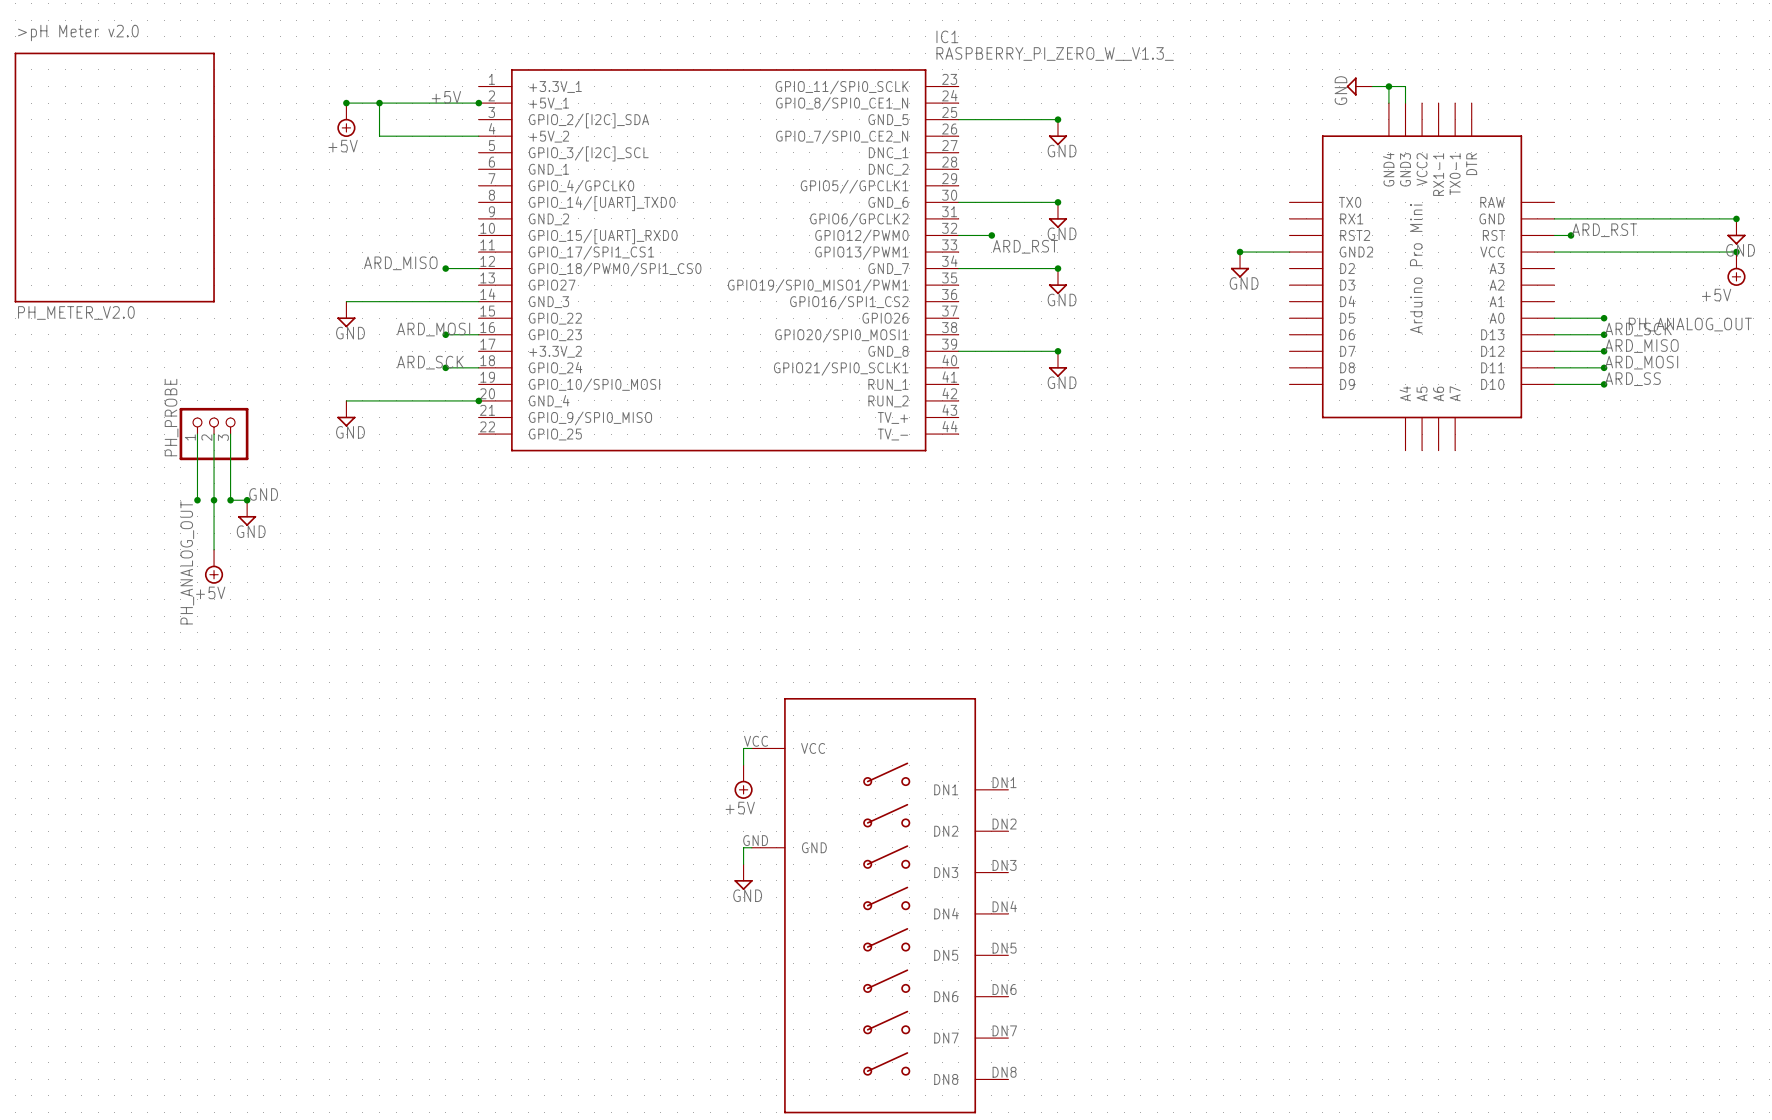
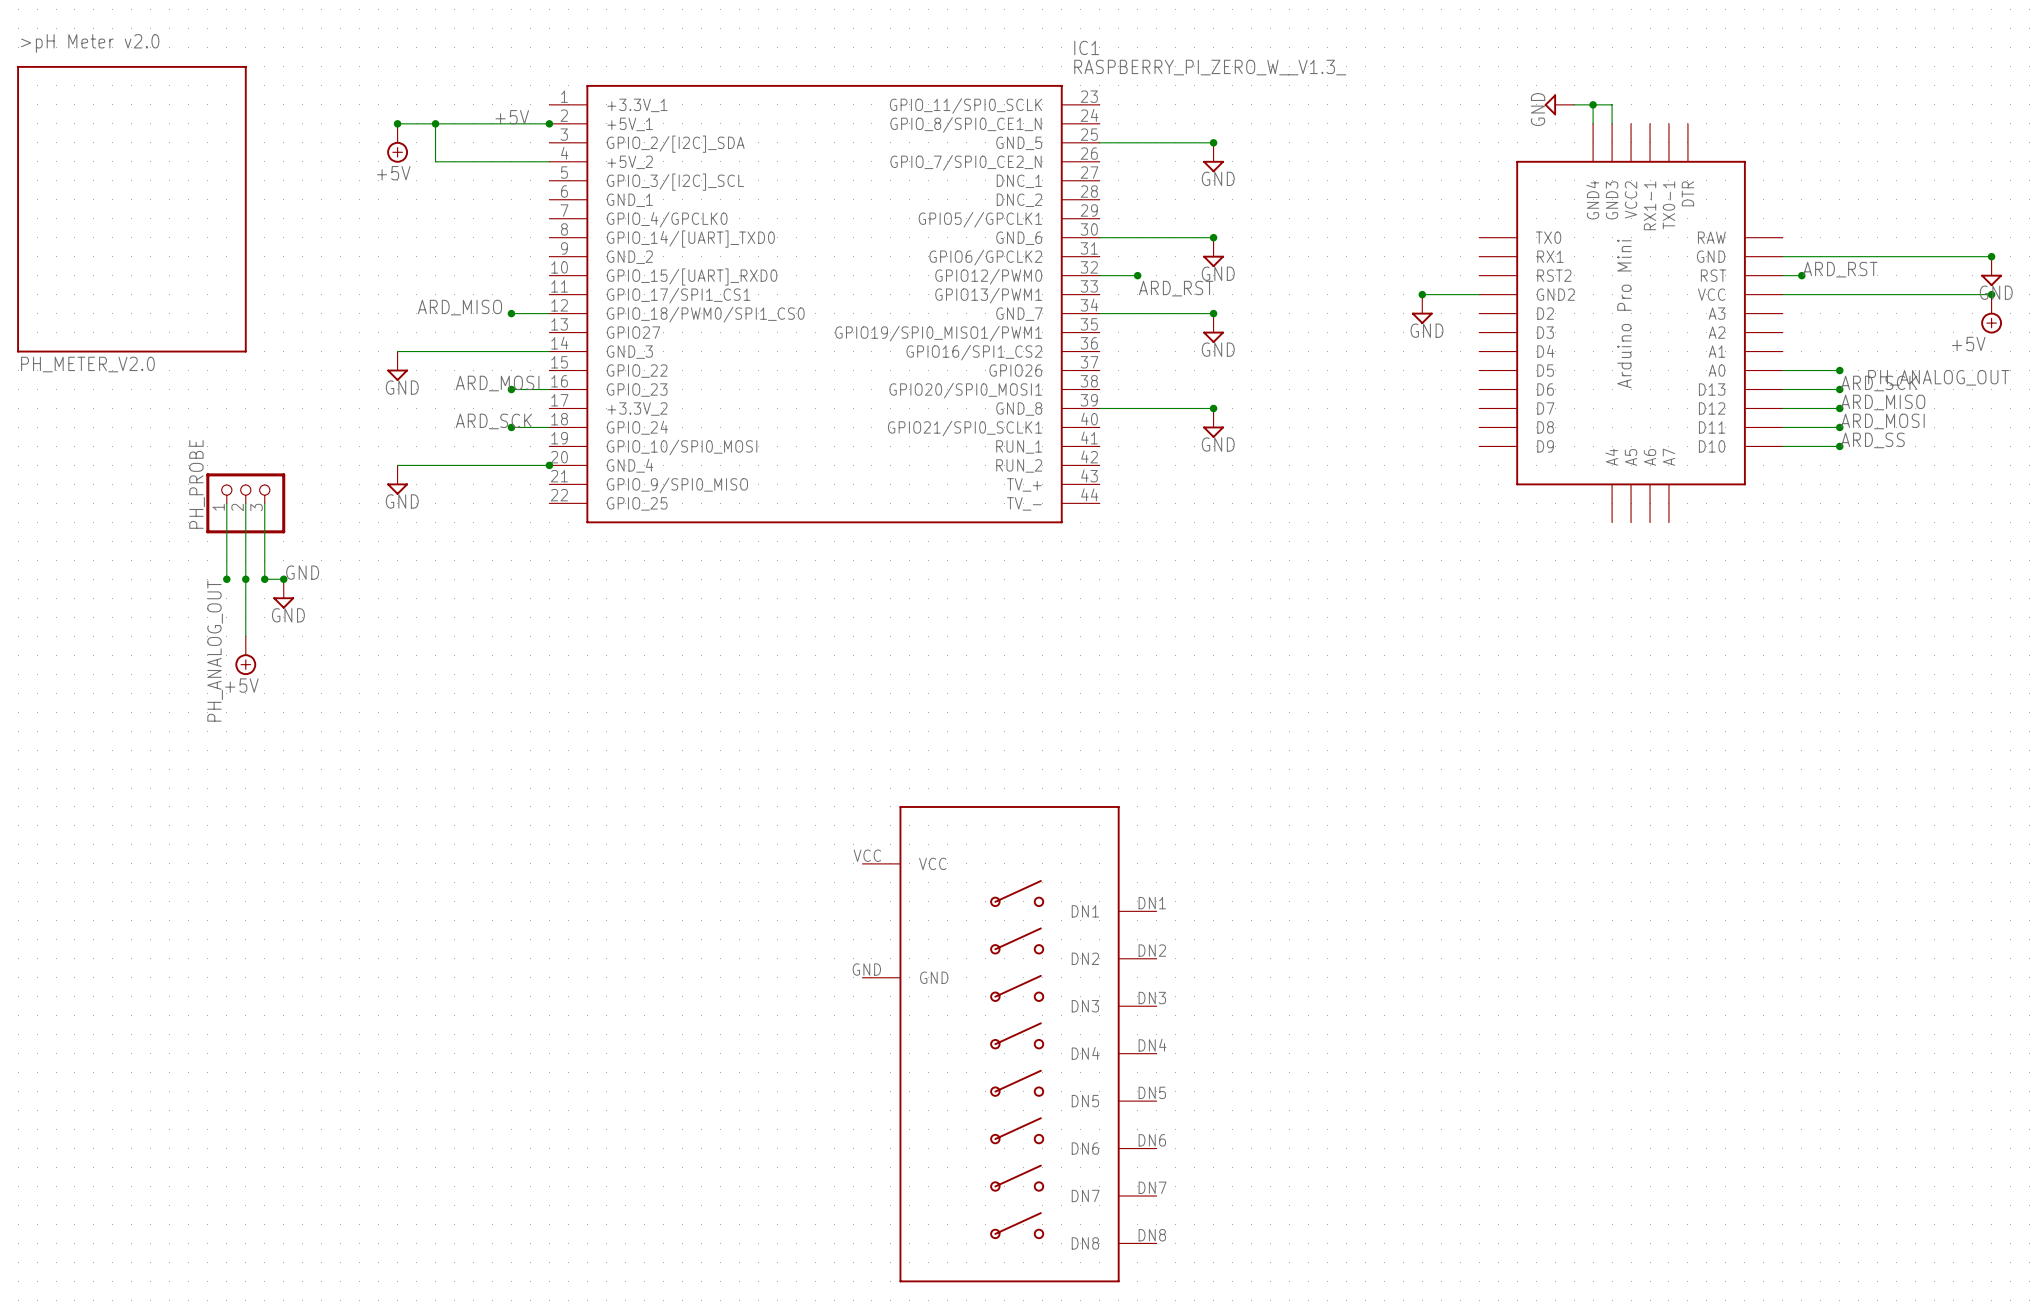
wire: (751, 748) (743, 748) (743, 765) -> none
power symbol: +5V (743, 781) -> none
wire: (751, 847) (743, 847) (743, 864) -> none
power symbol: GND (743, 877) -> none

